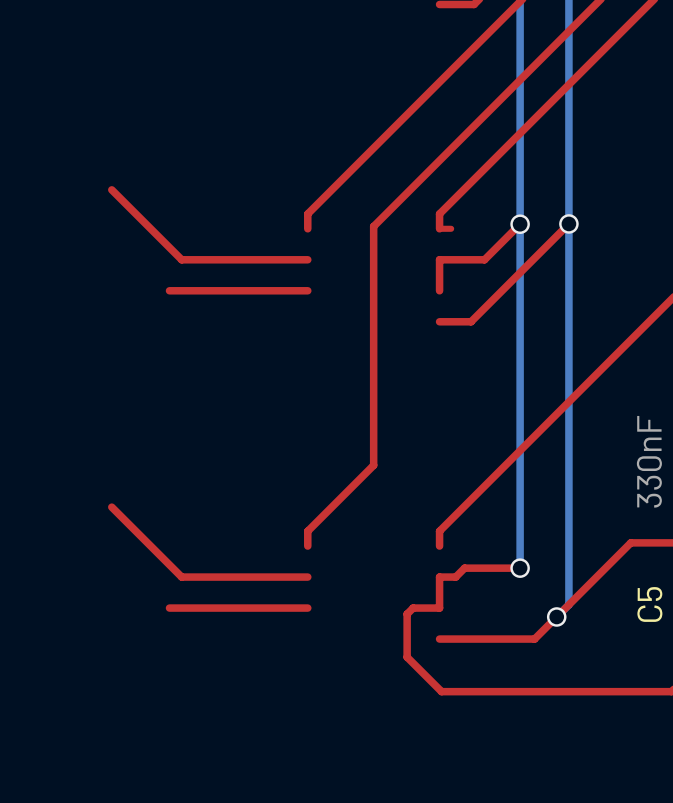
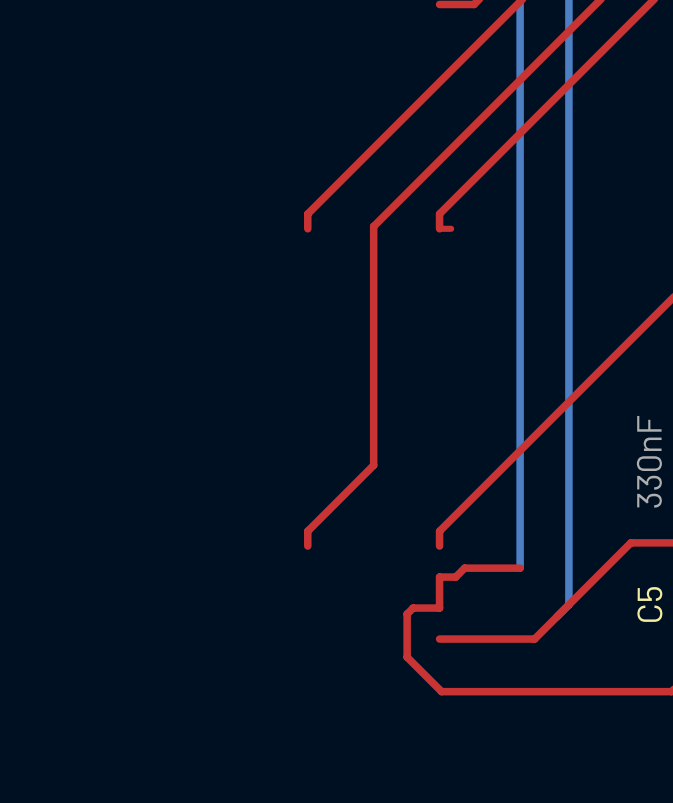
top track: (111, 189) (181, 259) (307, 259) -> none
top track: (568, 223) (471, 321) (439, 321) -> none
via: (568, 223) -> none
top track: (520, 224) (484, 259) (439, 259) (439, 290) -> none
via: (520, 224) -> none
top track: (169, 290) (307, 290) -> none
top track: (111, 507) (181, 577) (307, 577) -> none
via: (520, 568) -> none
top track: (169, 608) (307, 608) -> none
via: (556, 616) -> none

